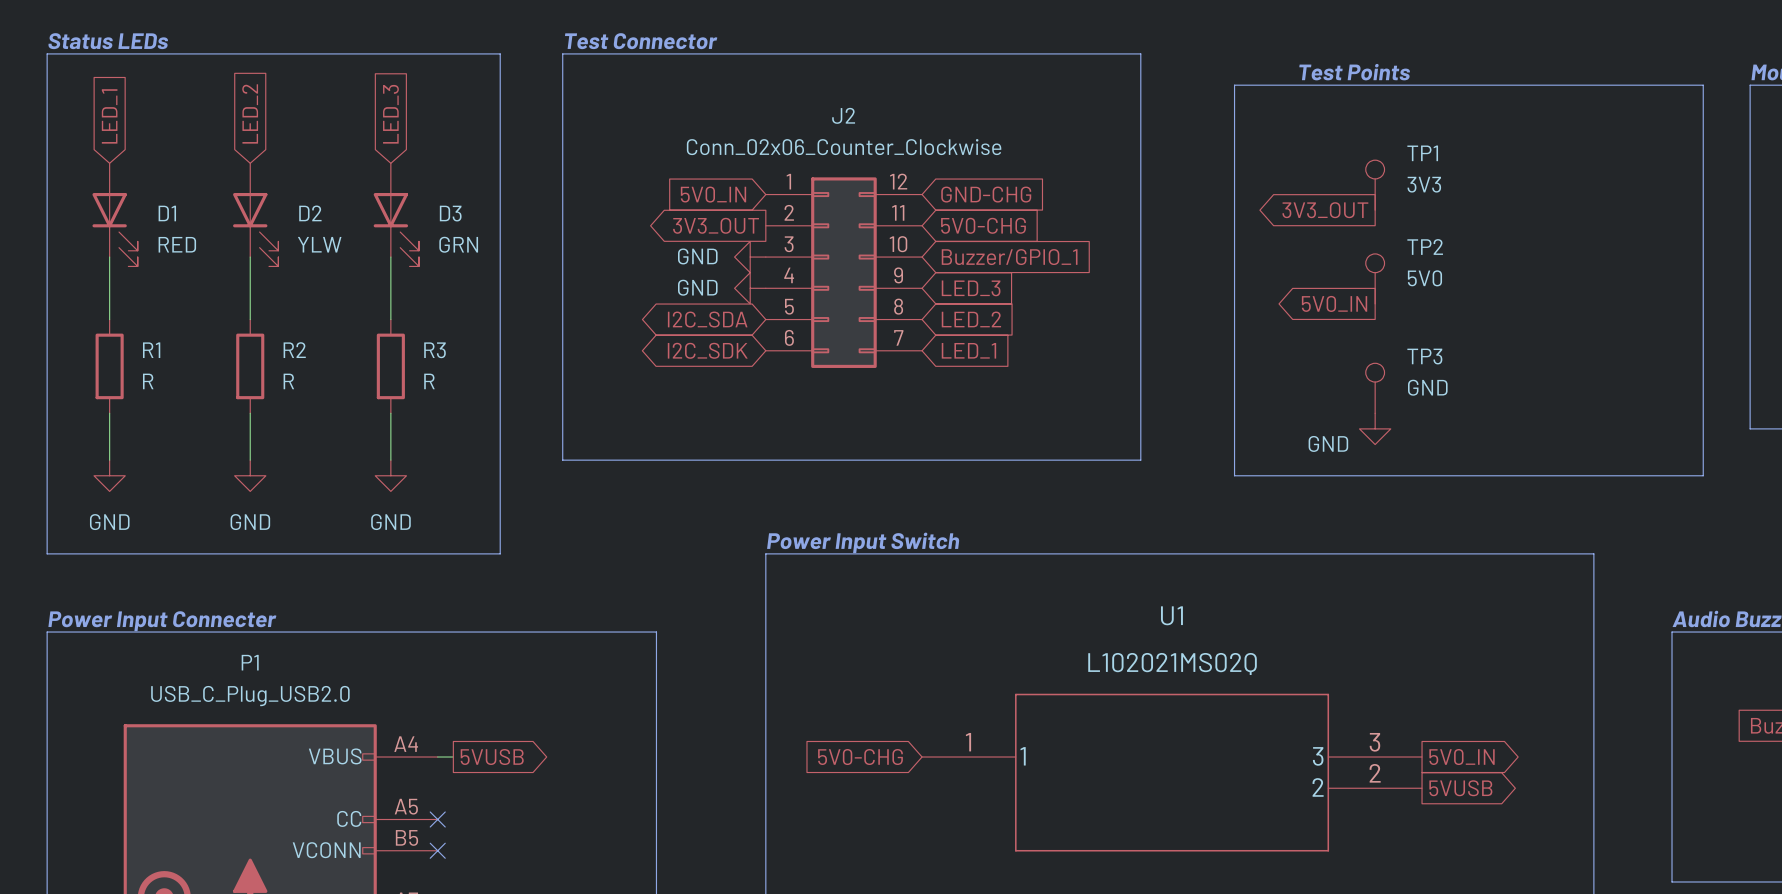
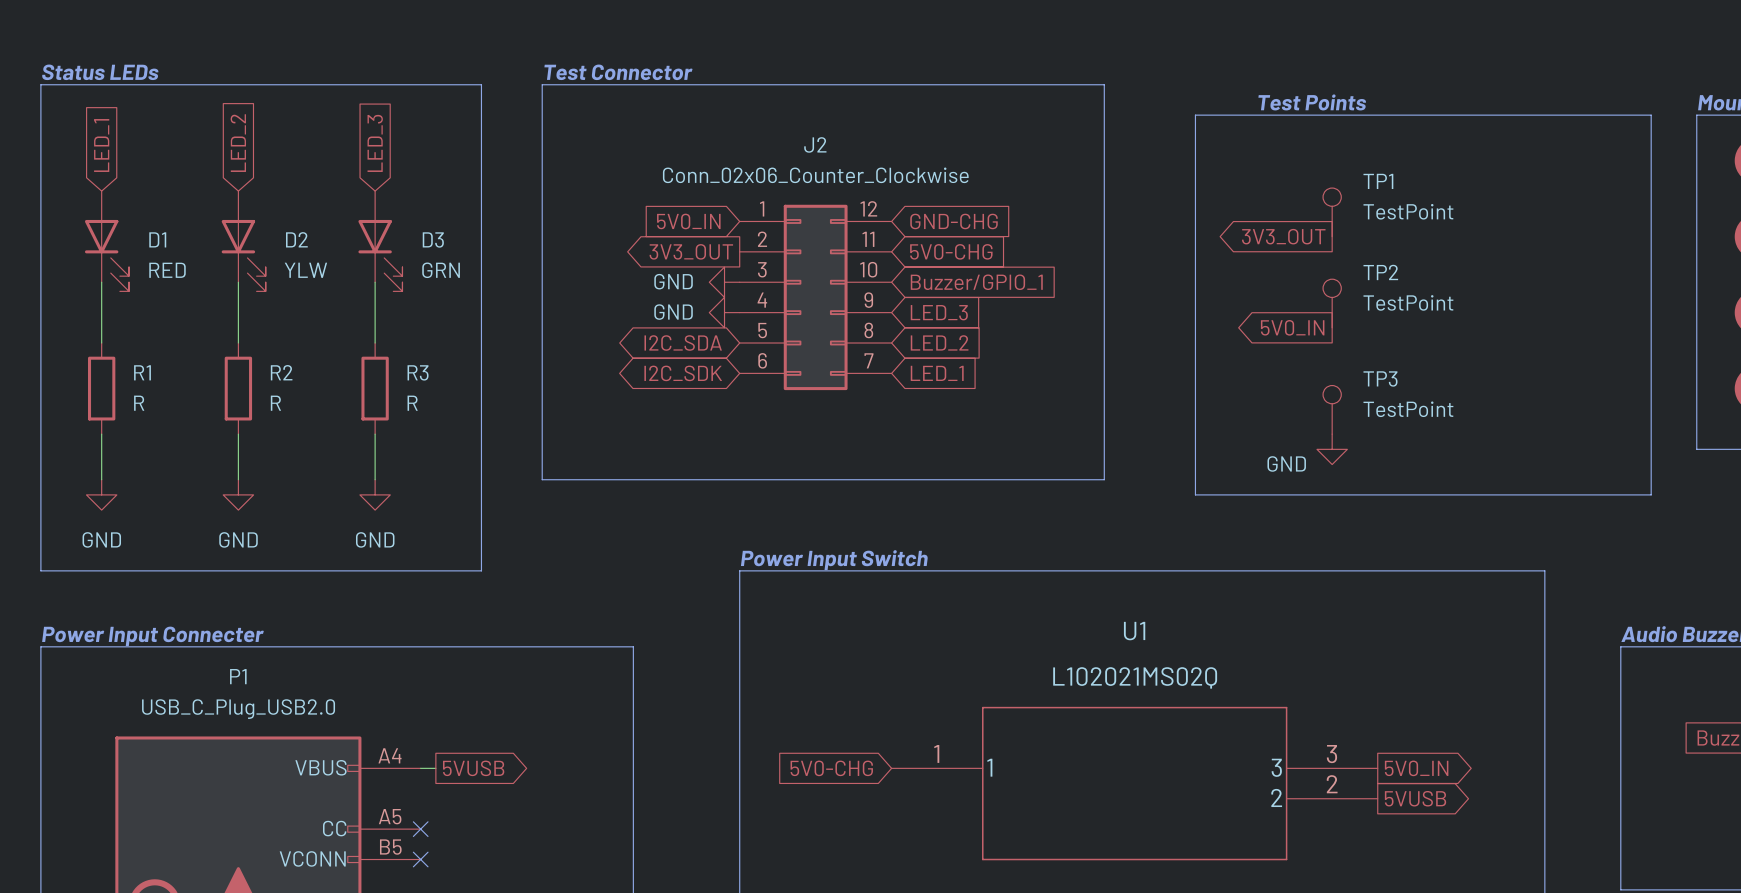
TP1 value: 3V3 (1424, 184) -> TestPoint (1408, 211)
TP2 value: 5V0 (1424, 278) -> TestPoint (1408, 302)
TP3 value: GND (1427, 387) -> TestPoint (1408, 409)

